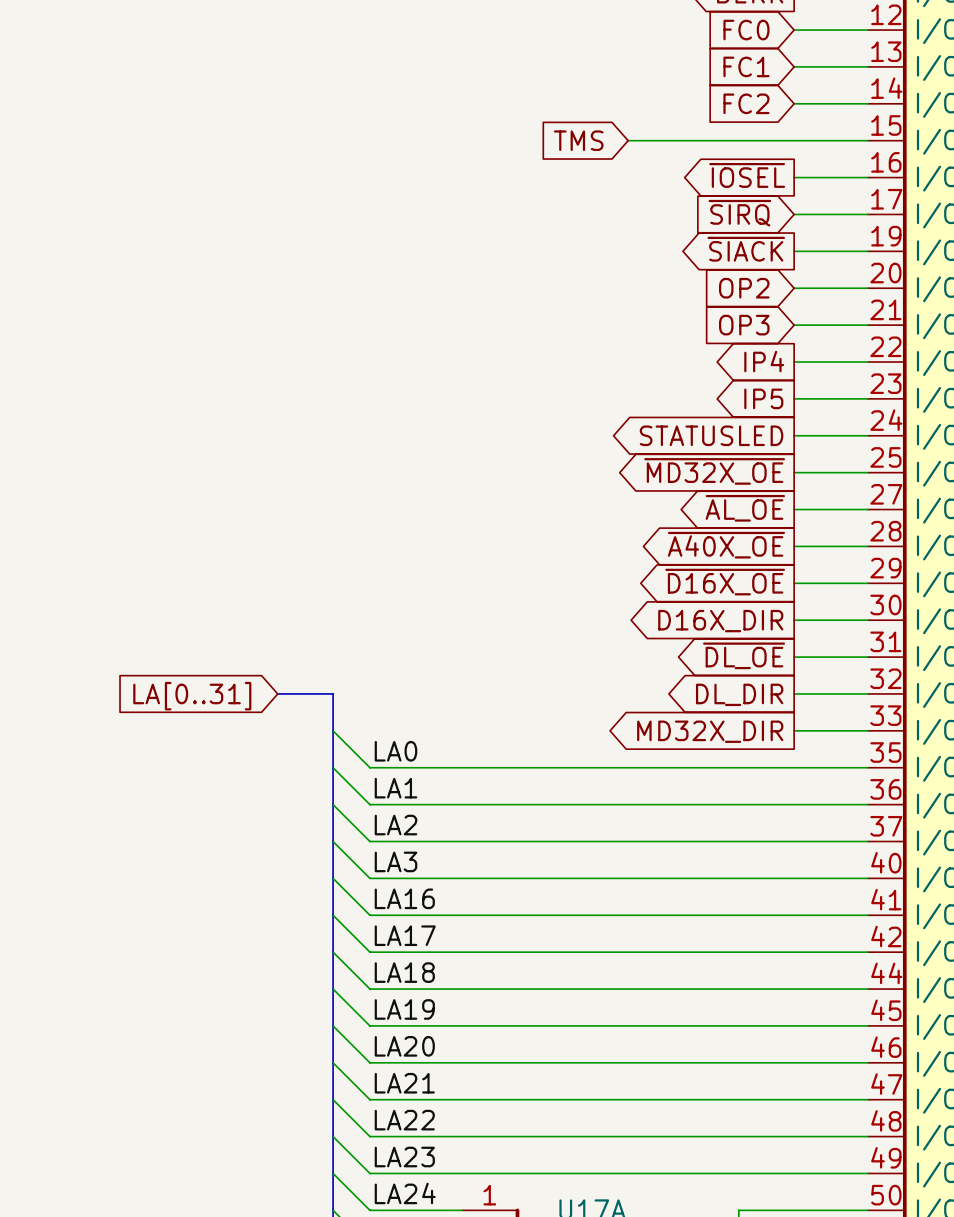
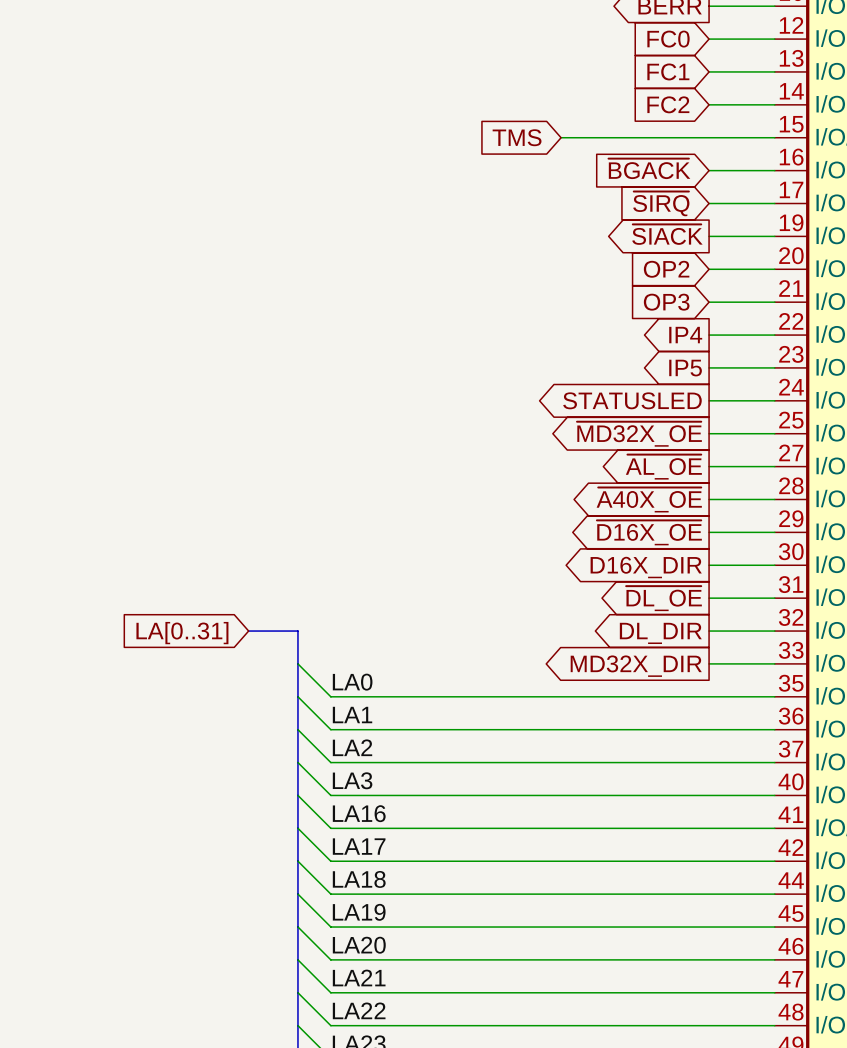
global label shape: output (747, 175) -> input (649, 168)
global label: ~{IOSEL} (747, 175) -> ~{BGACK} (649, 168)

